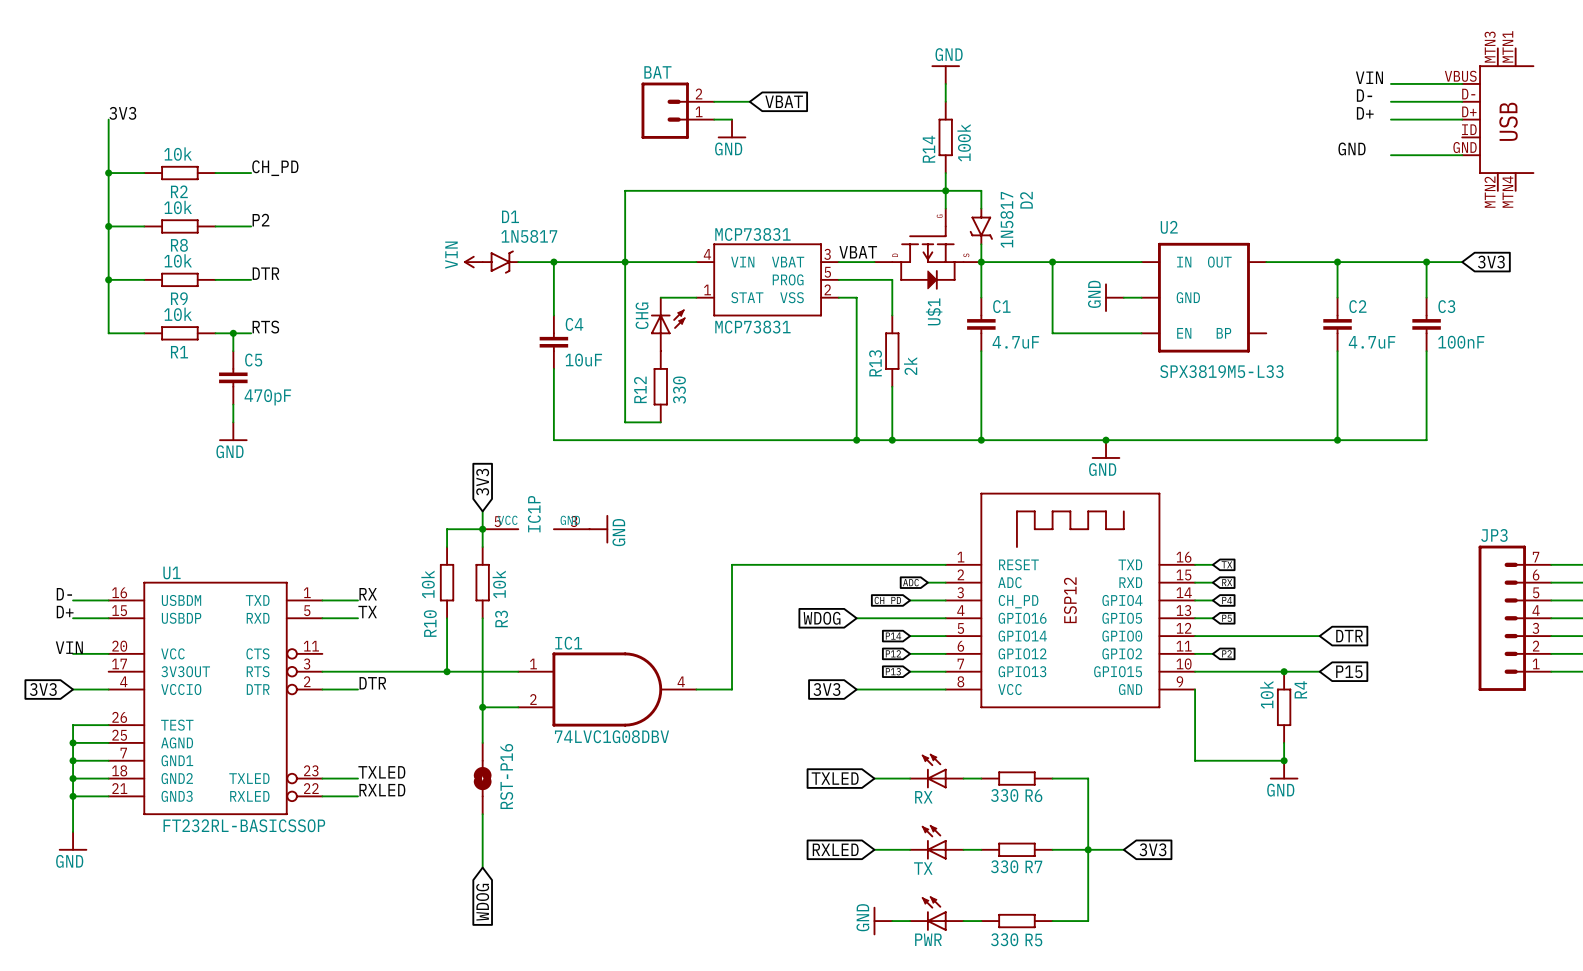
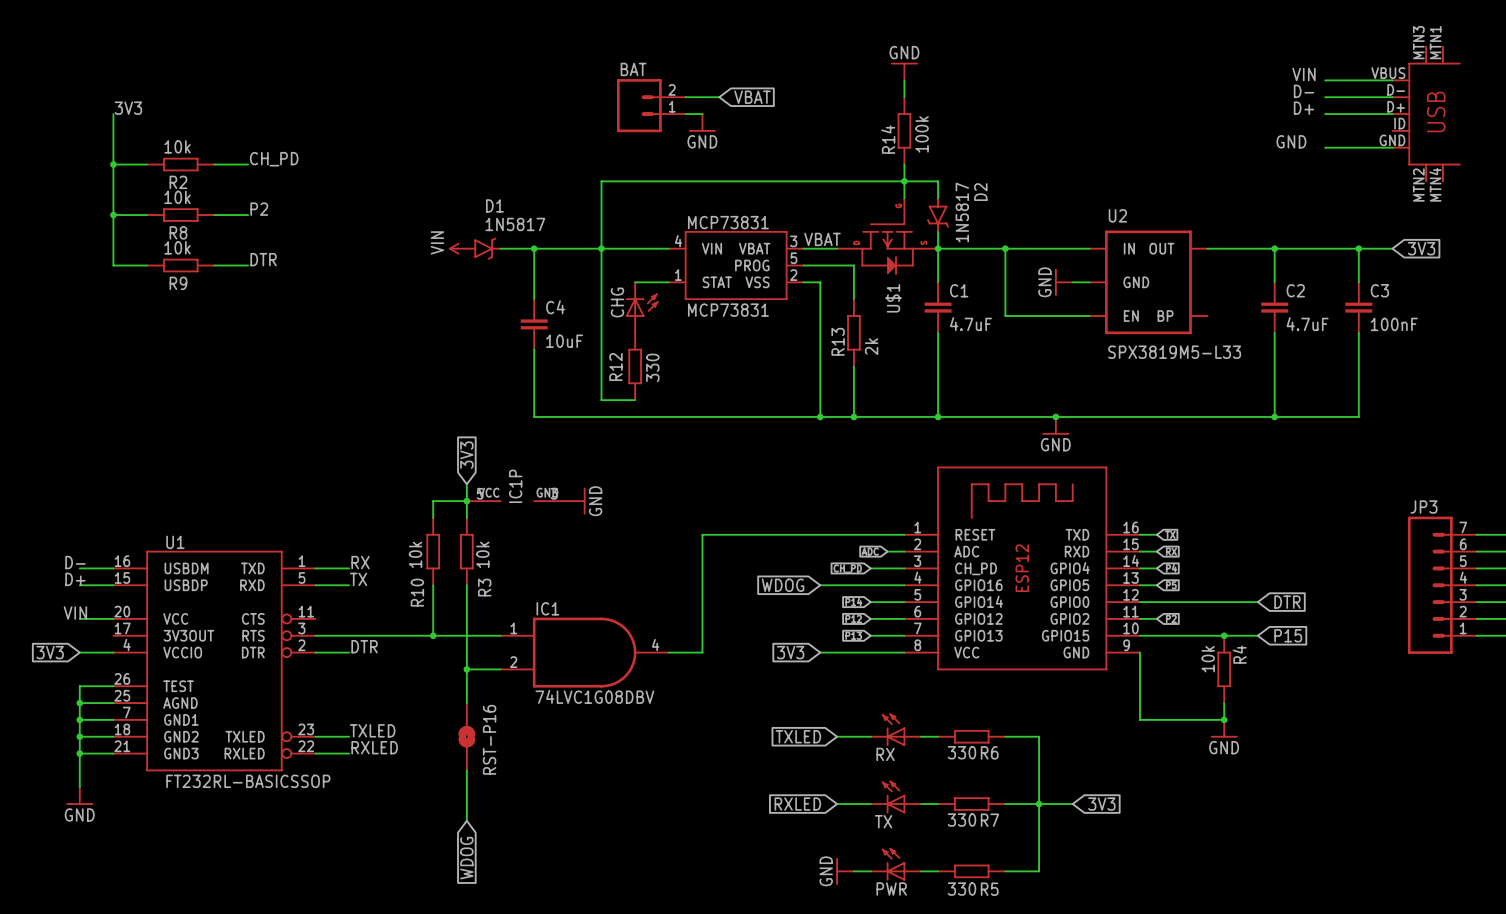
wire: (108, 279) (108, 333) (144, 333) -> none
junction: (108, 279) -> none
label: RTS (265, 327) -> none
R1: 10k (179, 333) -> none
wire: (215, 333) (251, 333) -> none
wire: (233, 333) (233, 351) -> none
junction: (233, 333) -> none
C5: 470pF (233, 377) -> none
wire: (233, 404) (233, 422) -> none
power symbol: GND (233, 431) -> none

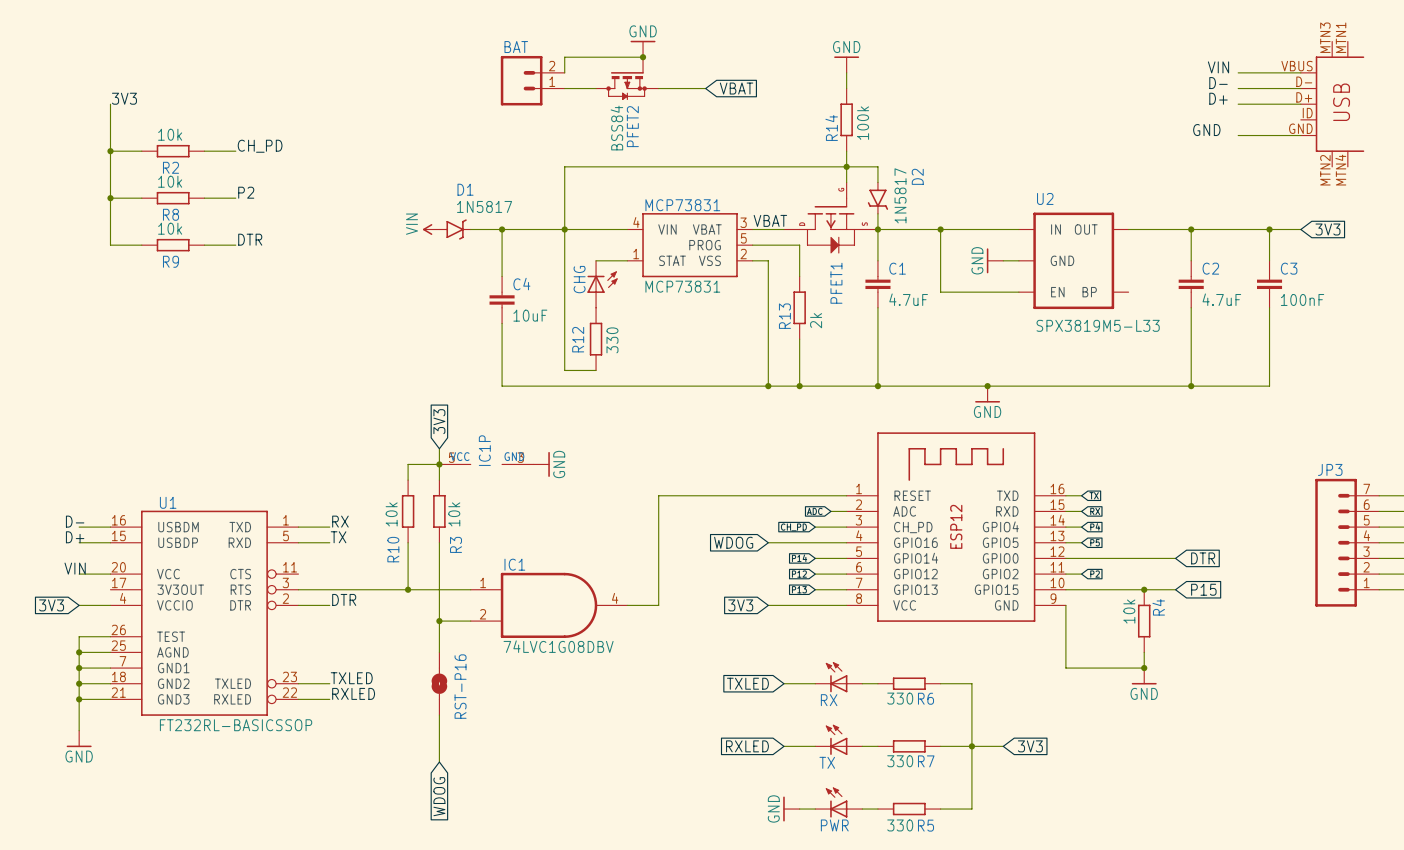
wire: none -> (643, 57) (564, 57) (564, 72)
junction: none -> (643, 57)
PFET2: none -> BSS84 (627, 78)
wire: none -> (564, 88) (596, 88)
wire: none -> (674, 88) (705, 88)
global label position: VBAT (752, 97) -> VBAT (736, 88)
BAT position: (651, 105) -> (532, 80)
wire: (685, 114) (702, 114) -> none
power symbol position: GND (702, 122) -> GND (643, 48)
power symbol rotation: 0° (702, 130) -> 180° (643, 41)
U$1 name: U$1 (893, 298) -> PFET1 (836, 283)

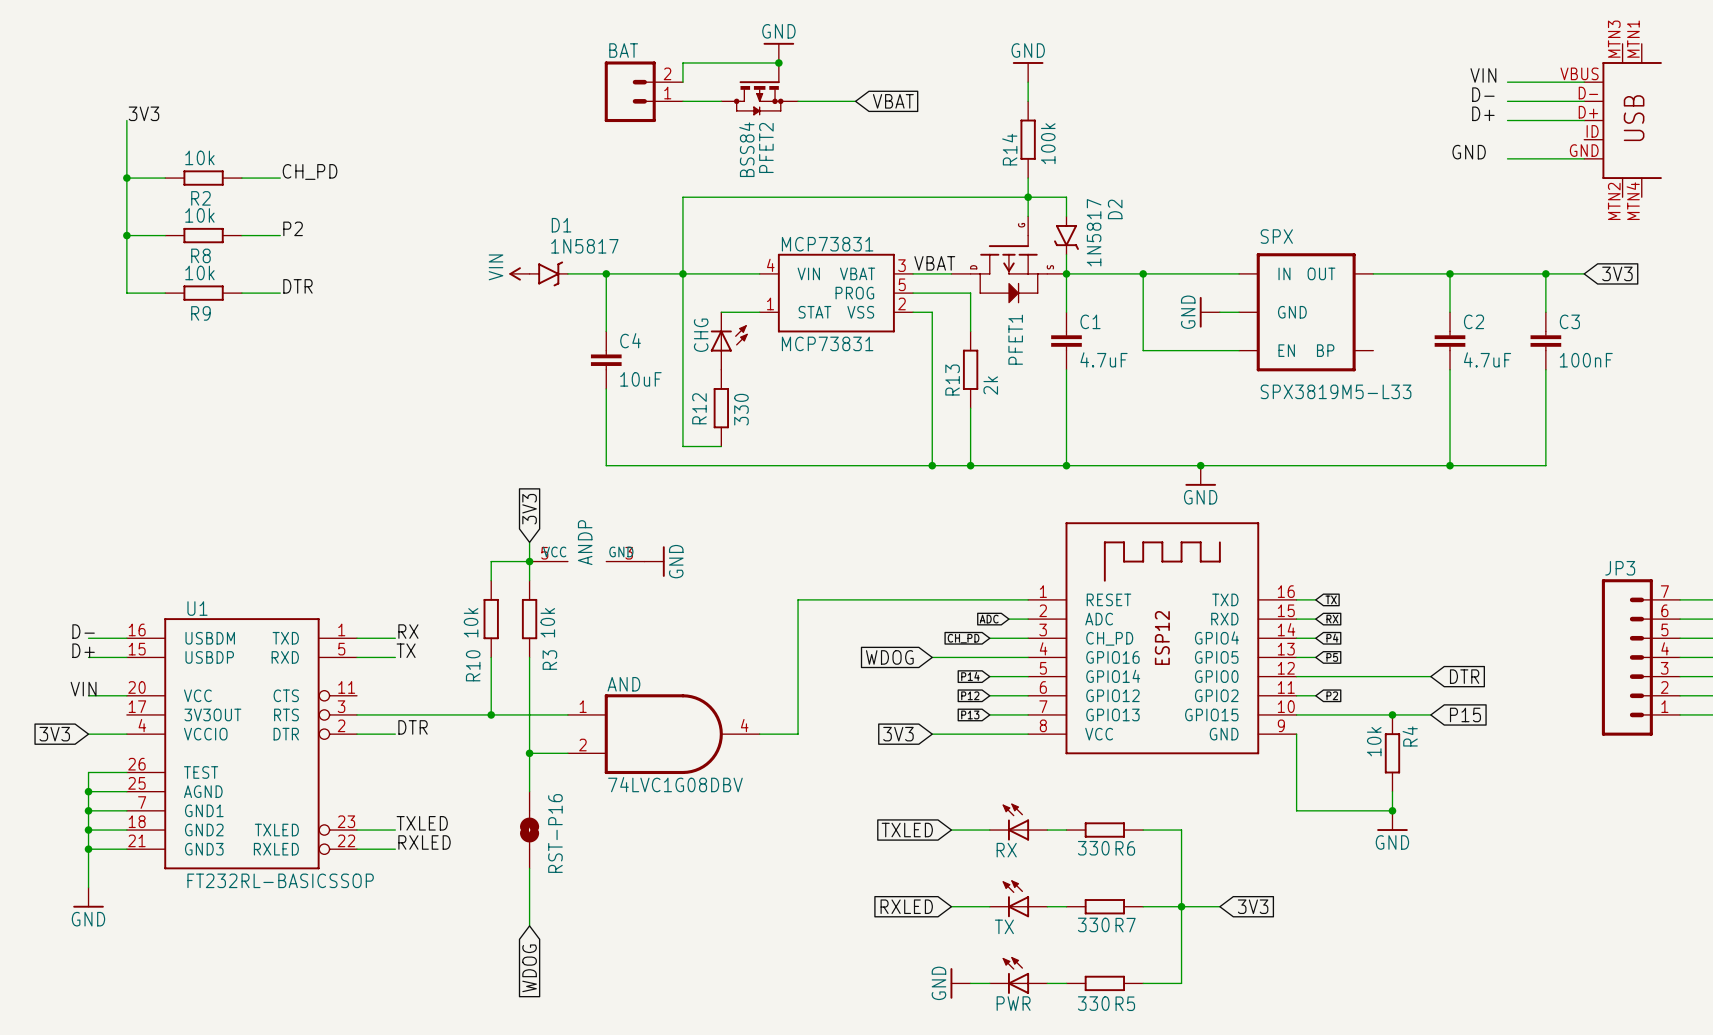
U2 name: U2 (1045, 198) -> SPX (1276, 236)
IC1P name: IC1P (484, 450) -> ANDP (585, 542)
IC1 name: IC1 (514, 564) -> AND (623, 684)

